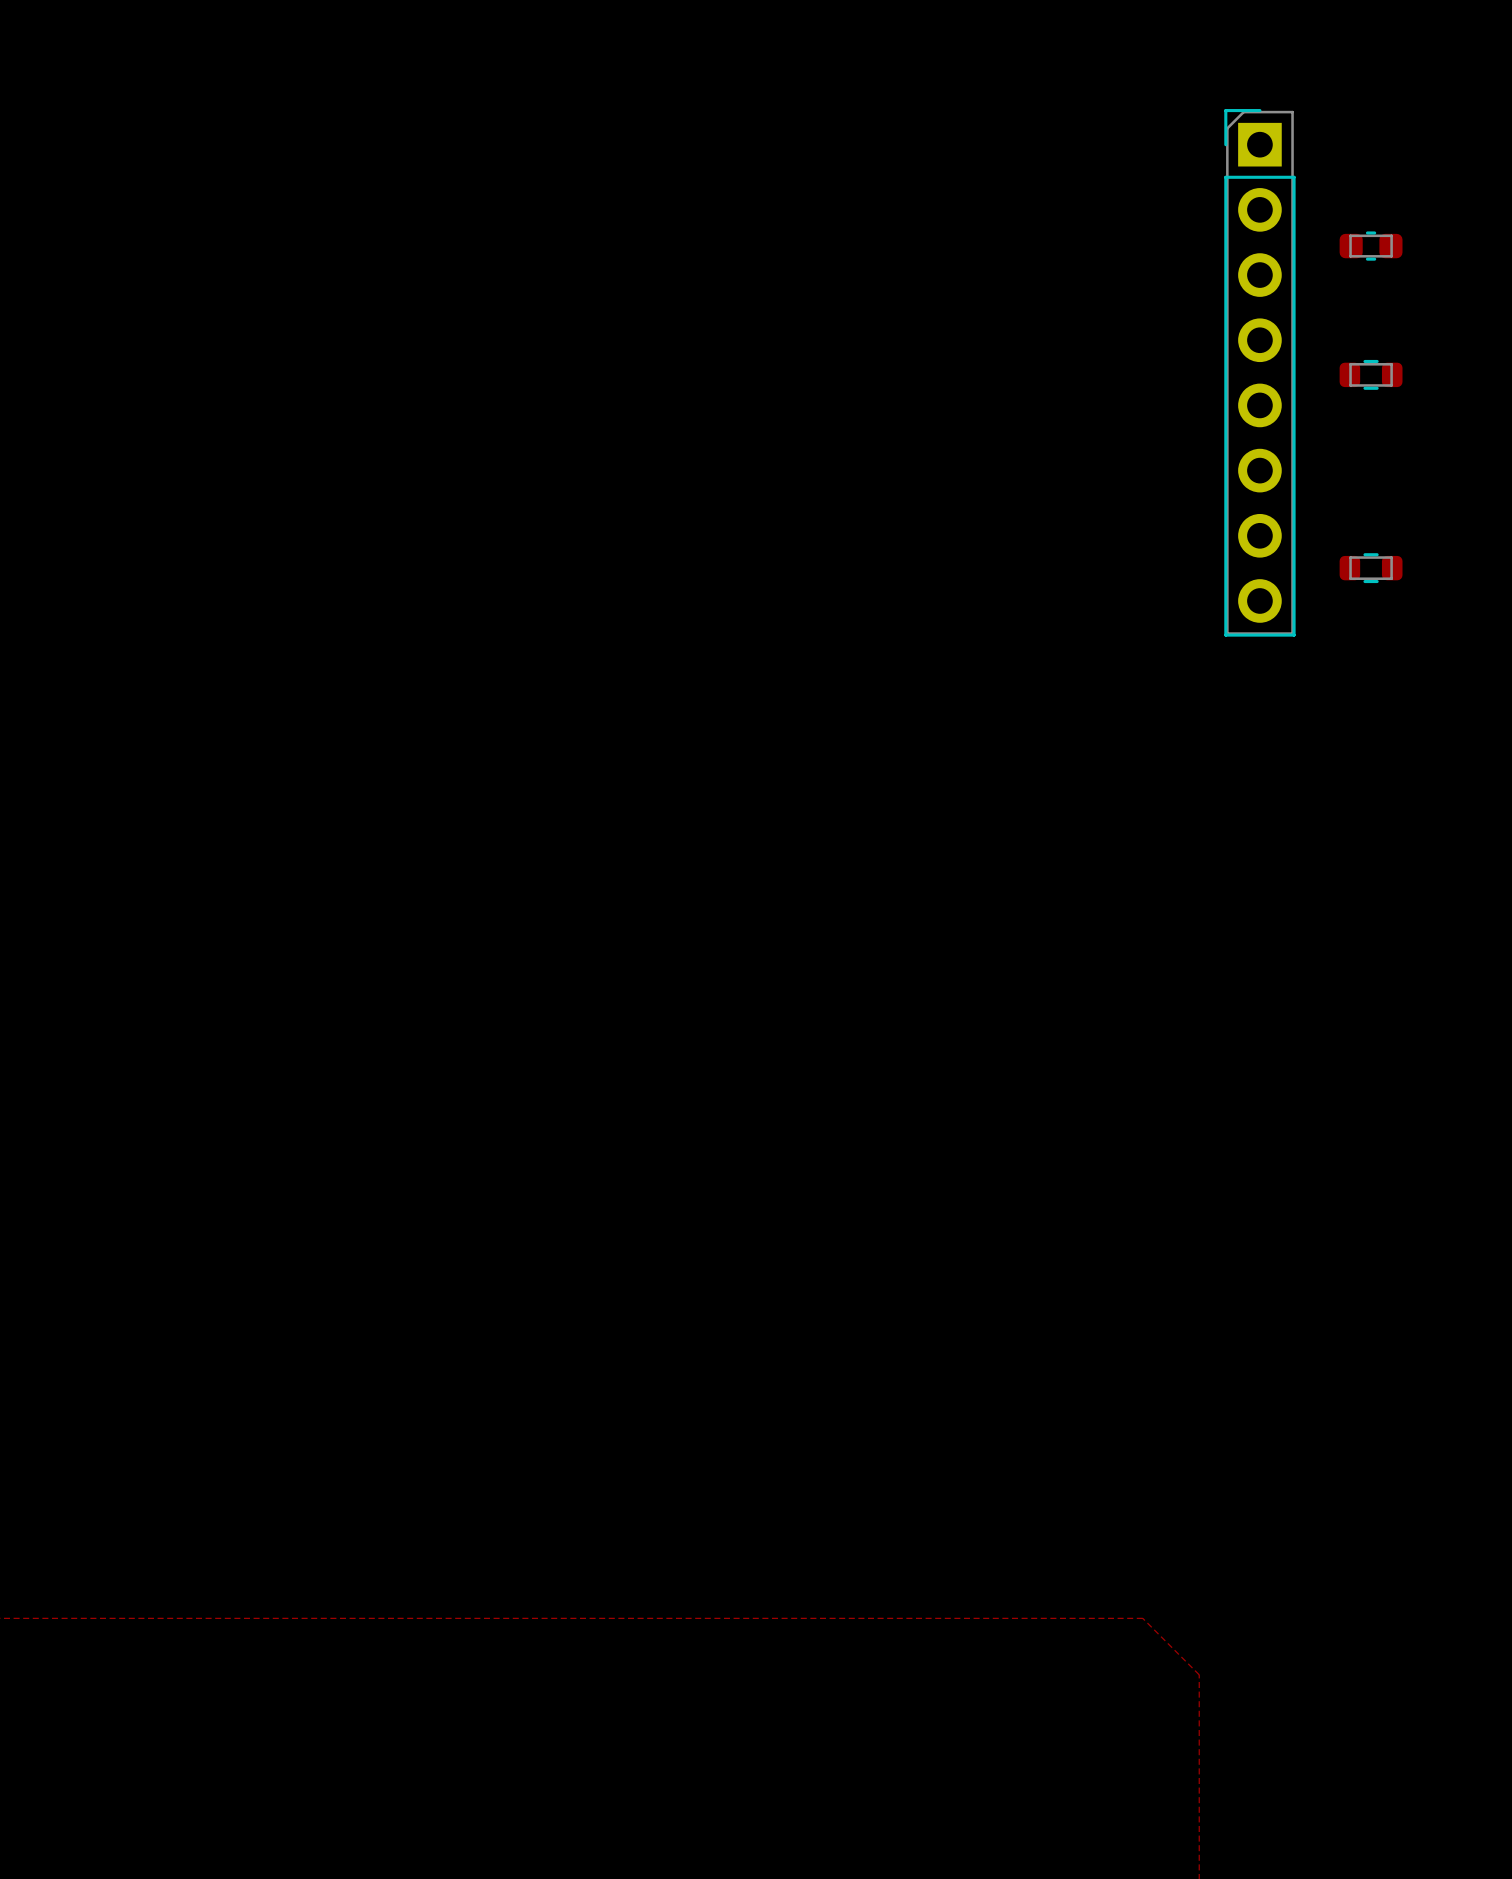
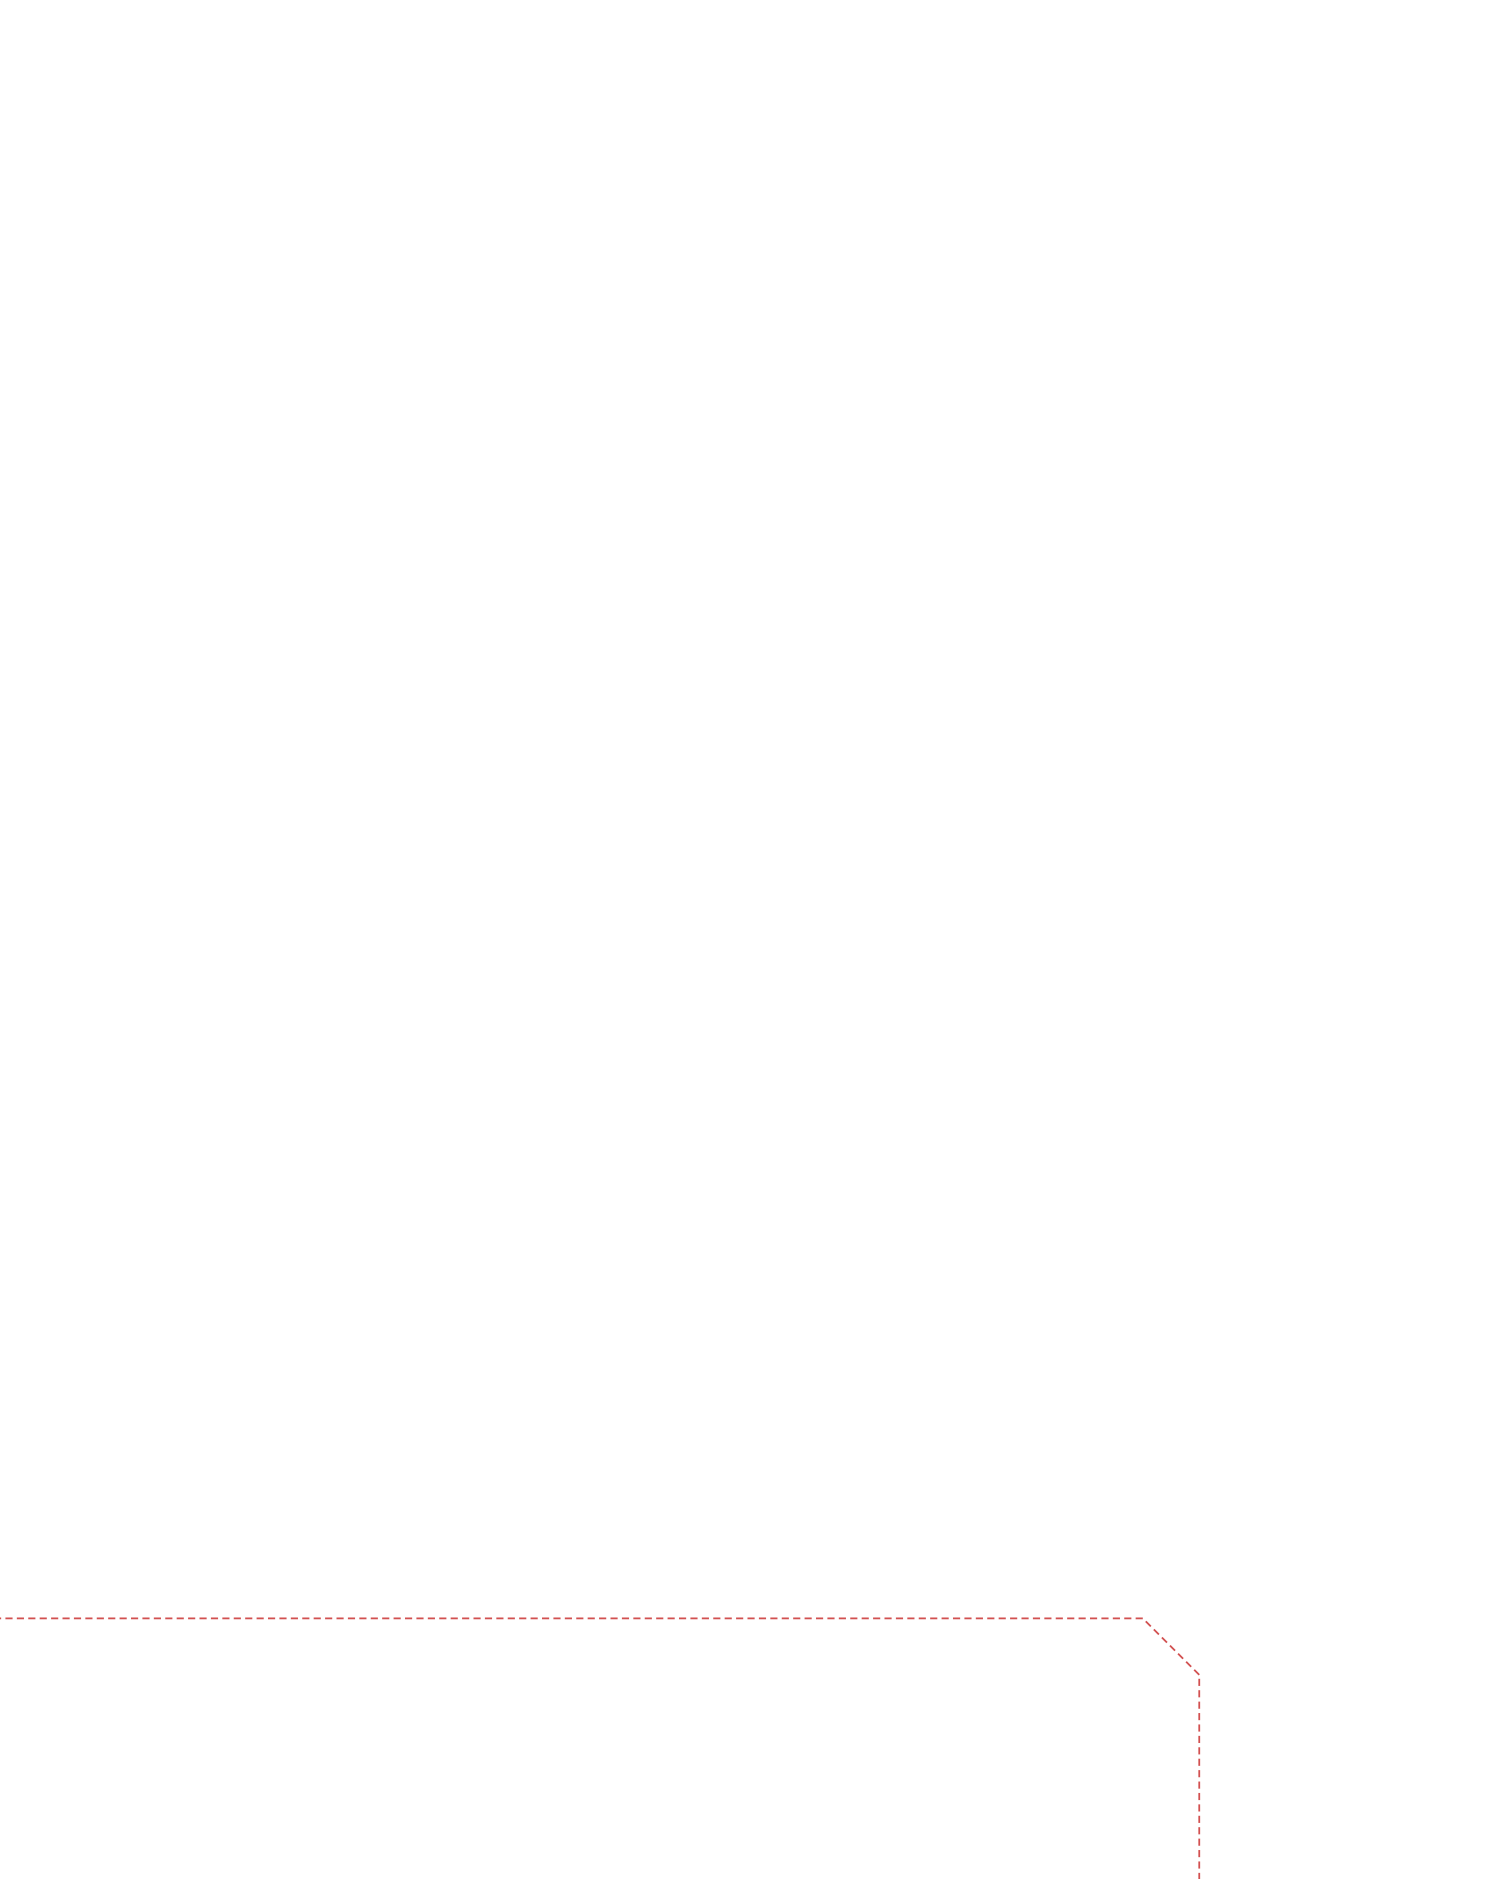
part: (1371, 246) -> none
part: (1259, 372) -> none
part: (1371, 374) -> none
part: (1371, 568) -> none

